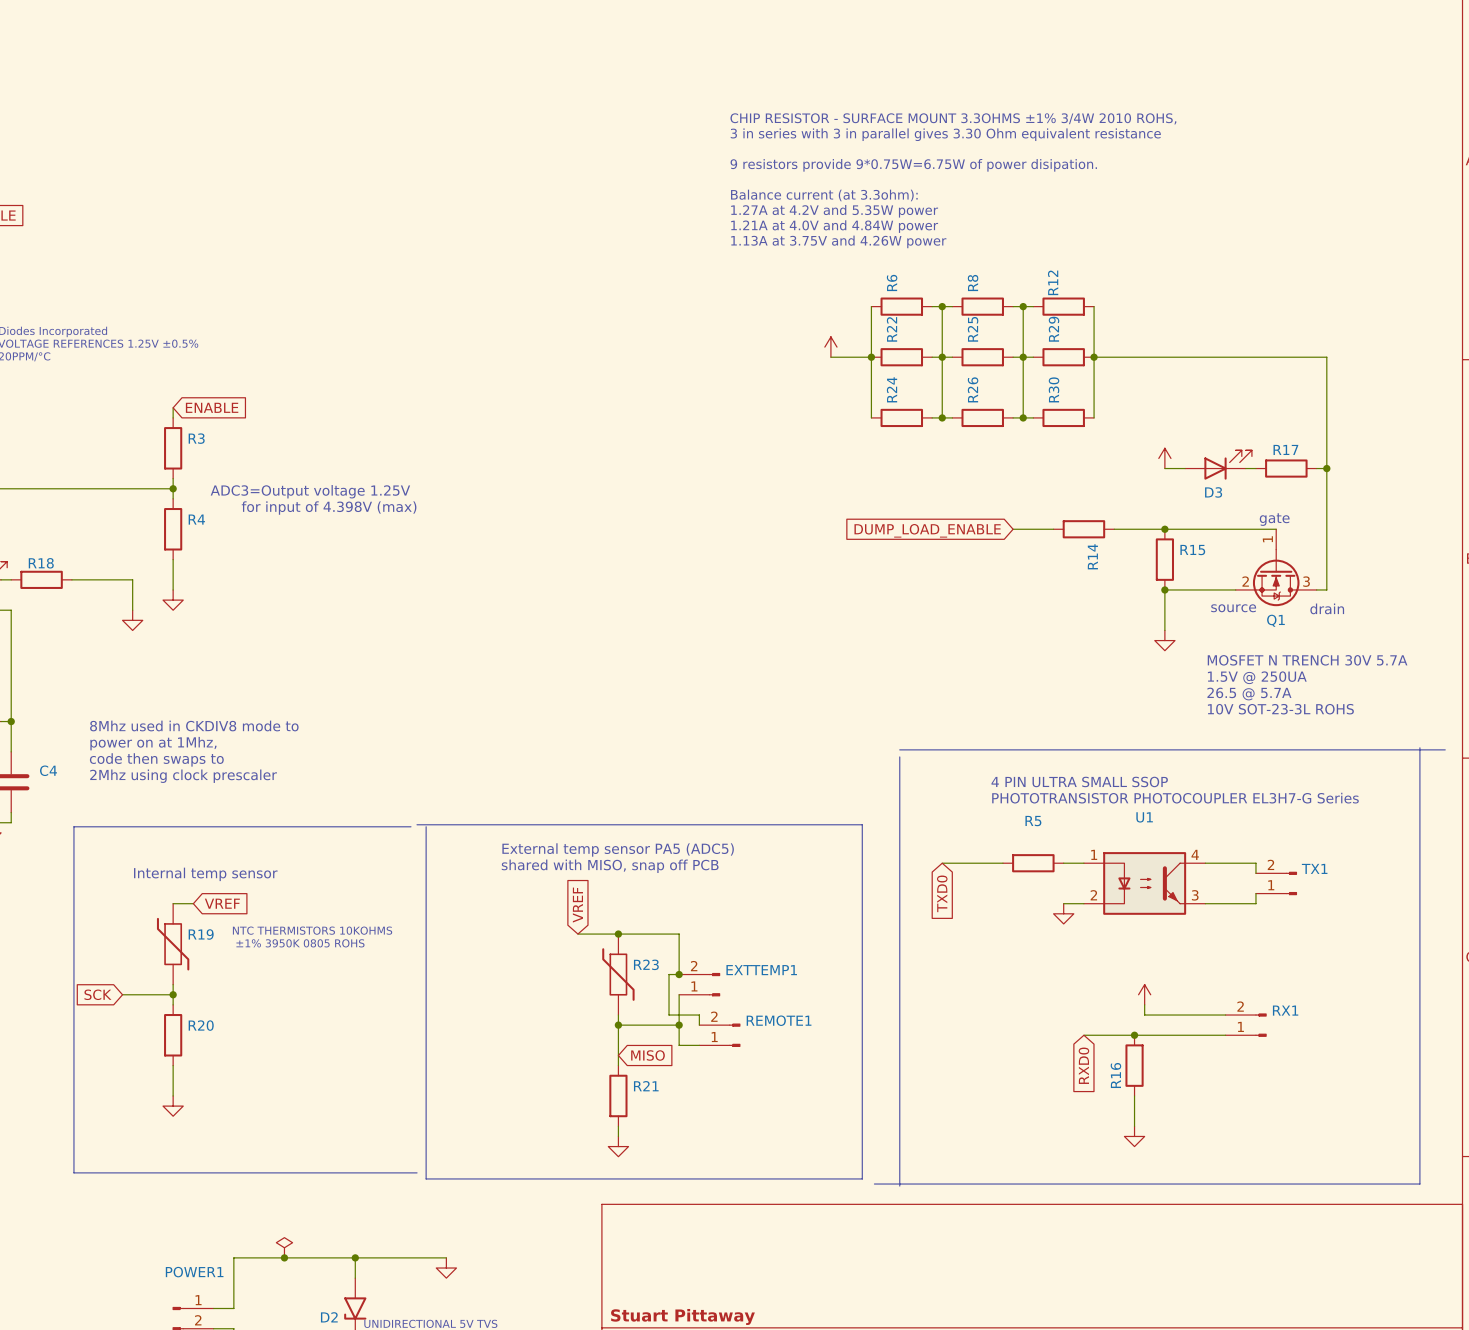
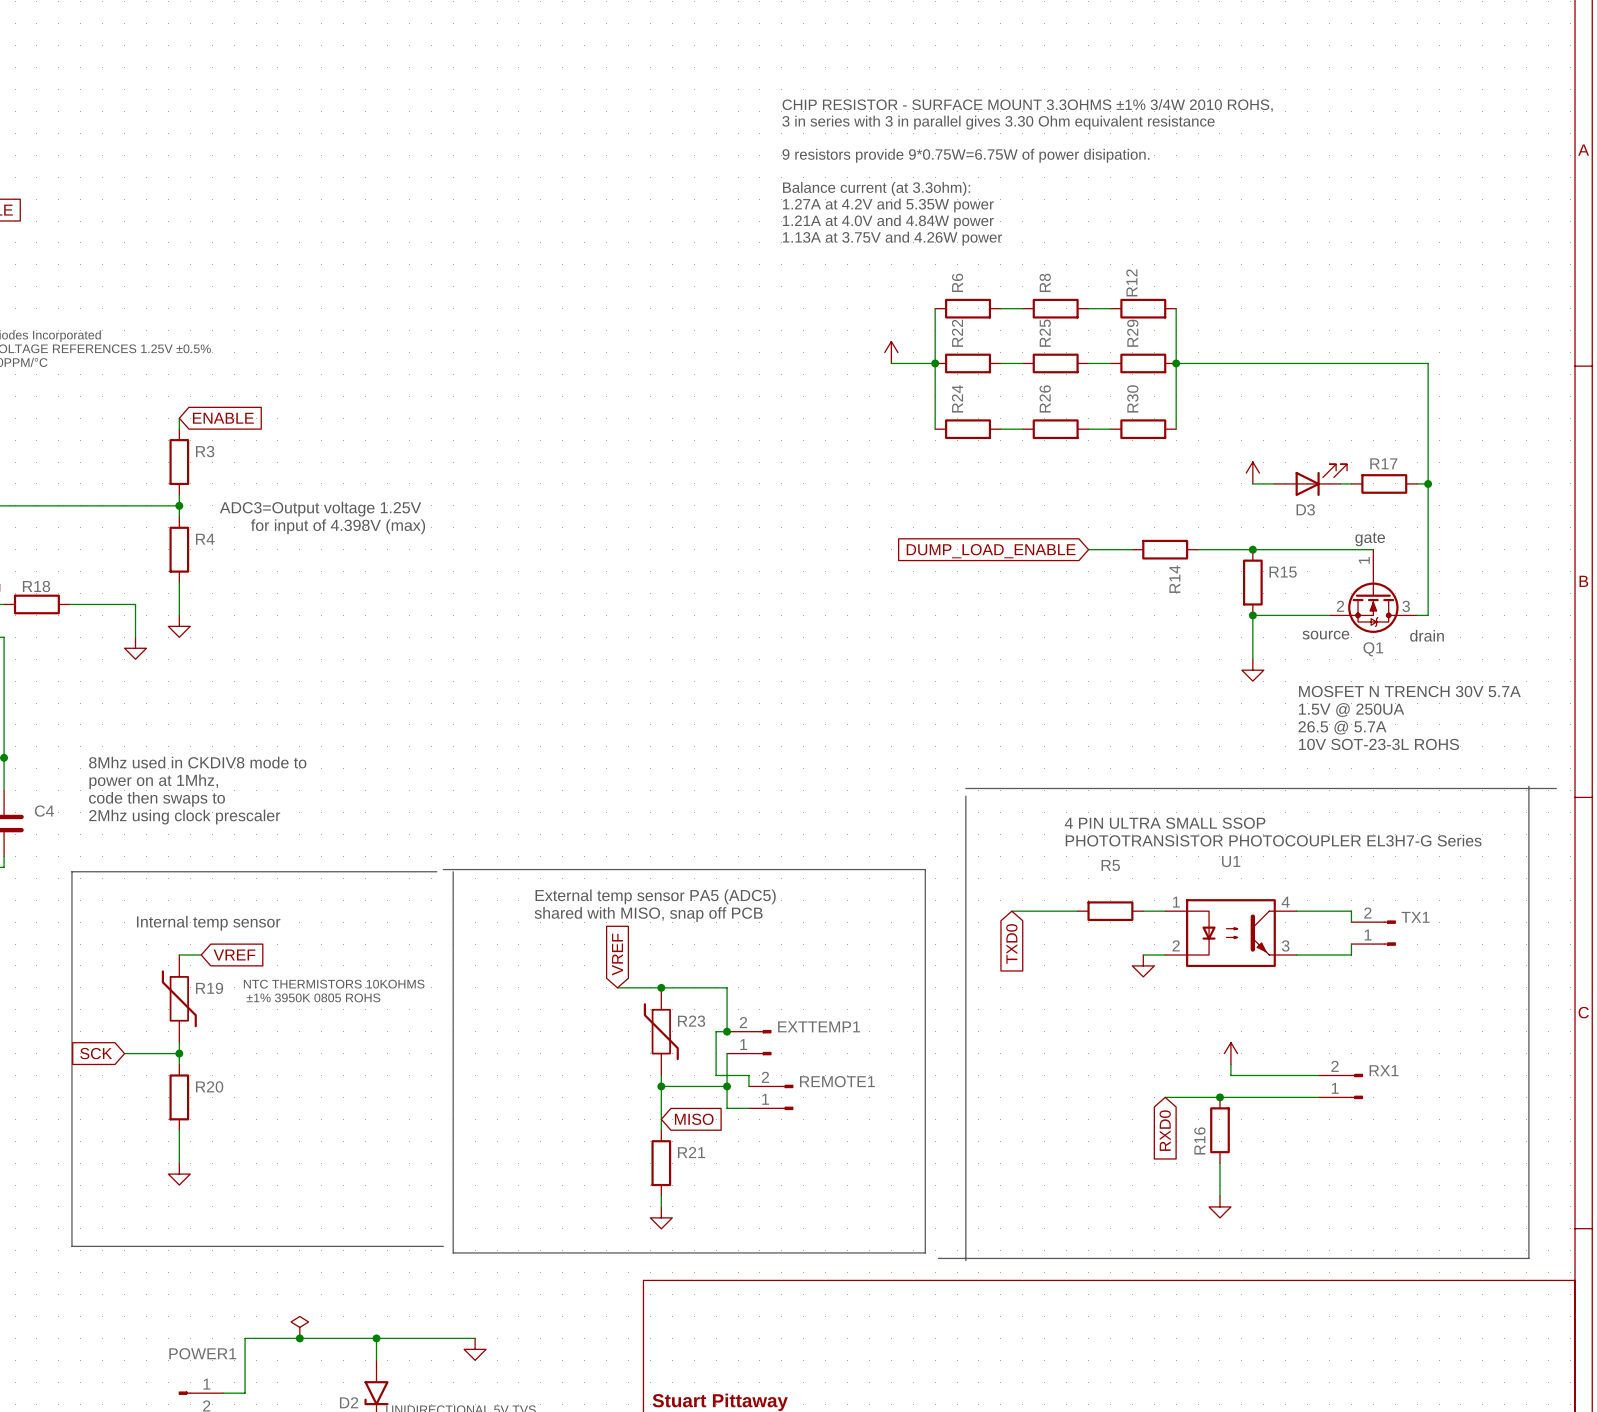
wire: (942, 306) (942, 417) -> none
junction: (942, 306) -> none
wire: (1023, 306) (1023, 417) -> none
junction: (1023, 306) -> none
junction: (942, 357) -> none
junction: (1023, 357) -> none
junction: (942, 417) -> none
junction: (1023, 417) -> none

